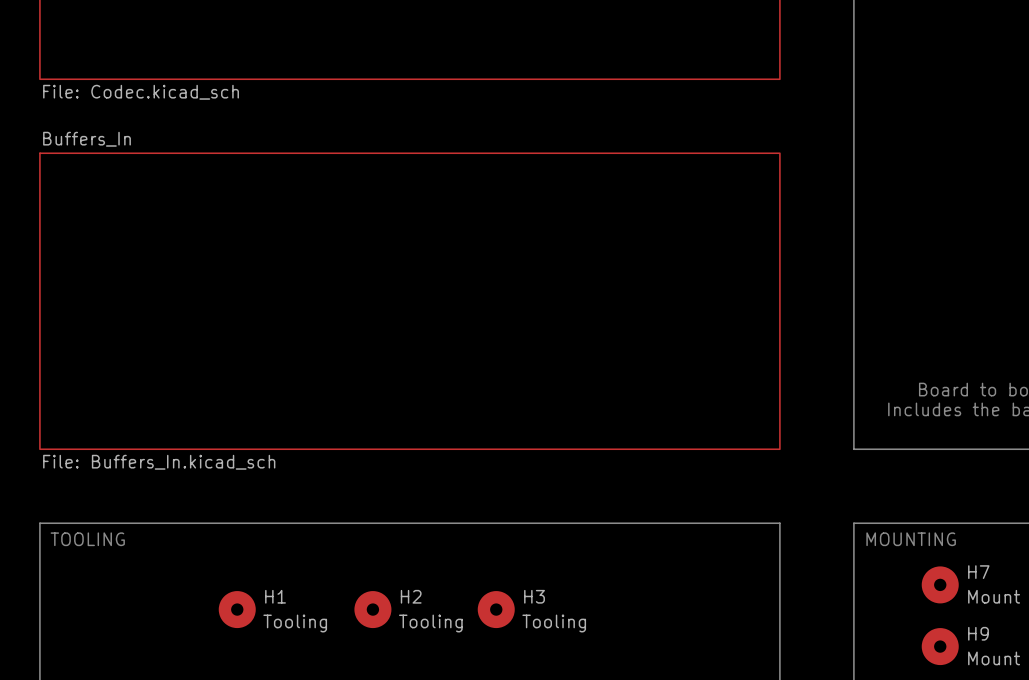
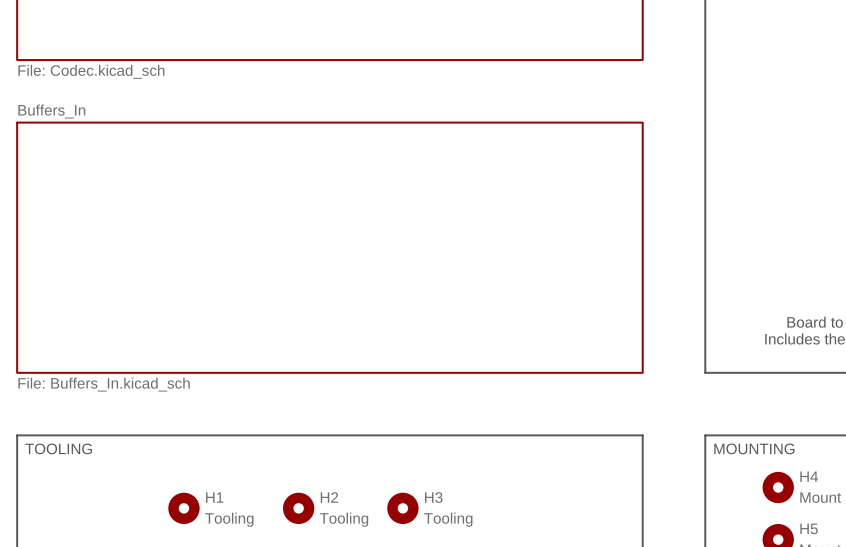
H7 name: H7 (978, 572) -> H4 (809, 476)
H9 name: H9 (978, 633) -> H5 (809, 528)

